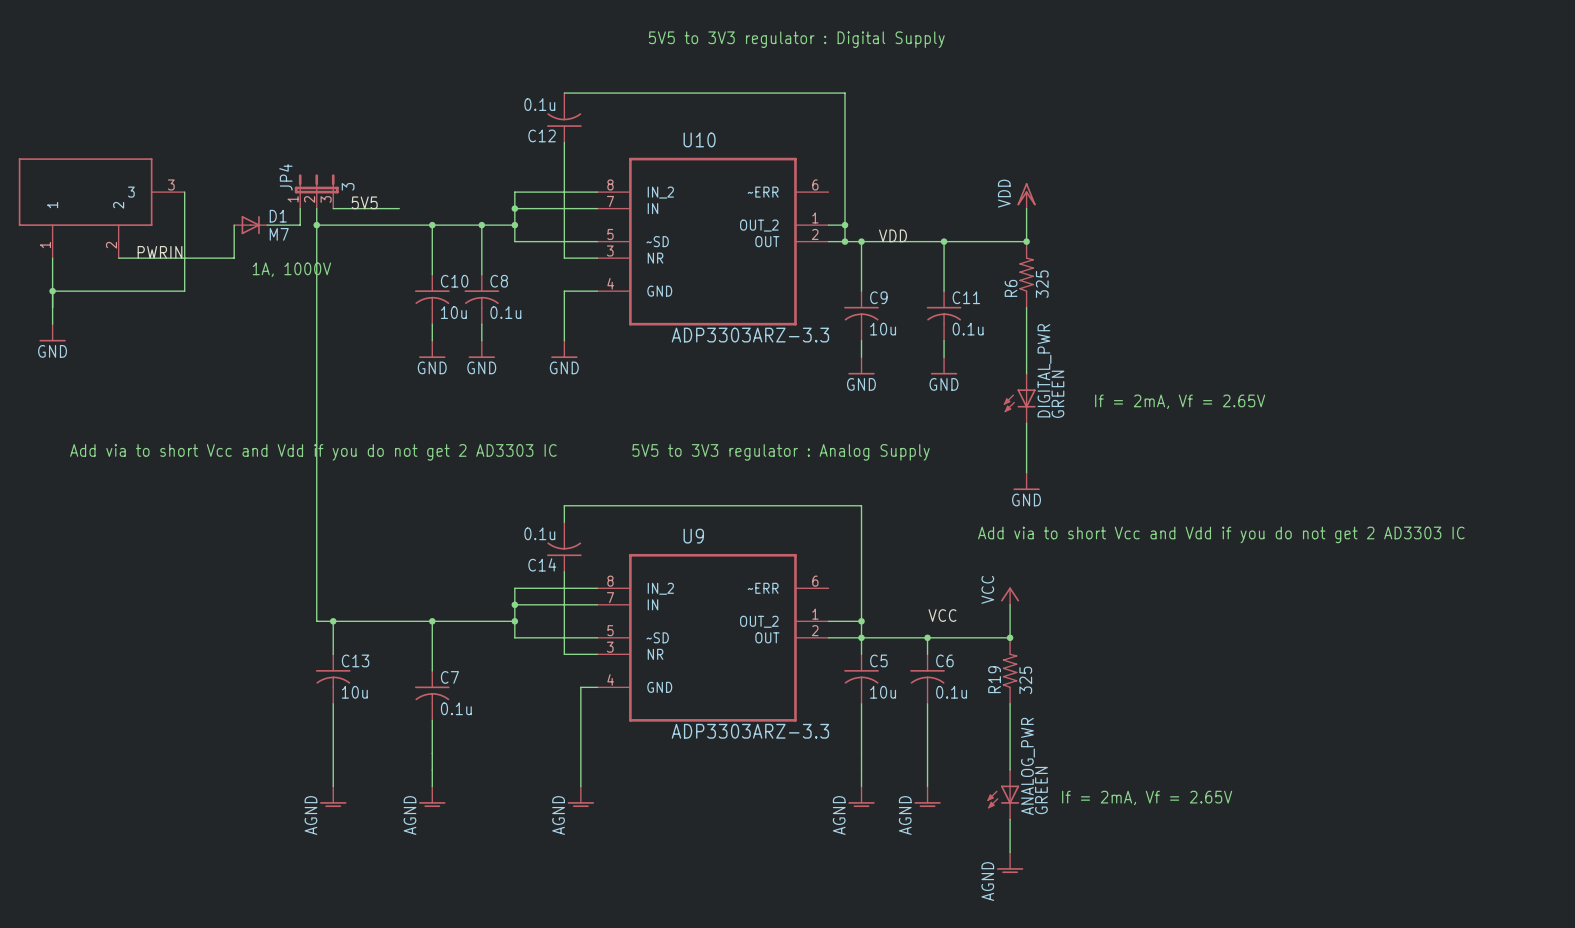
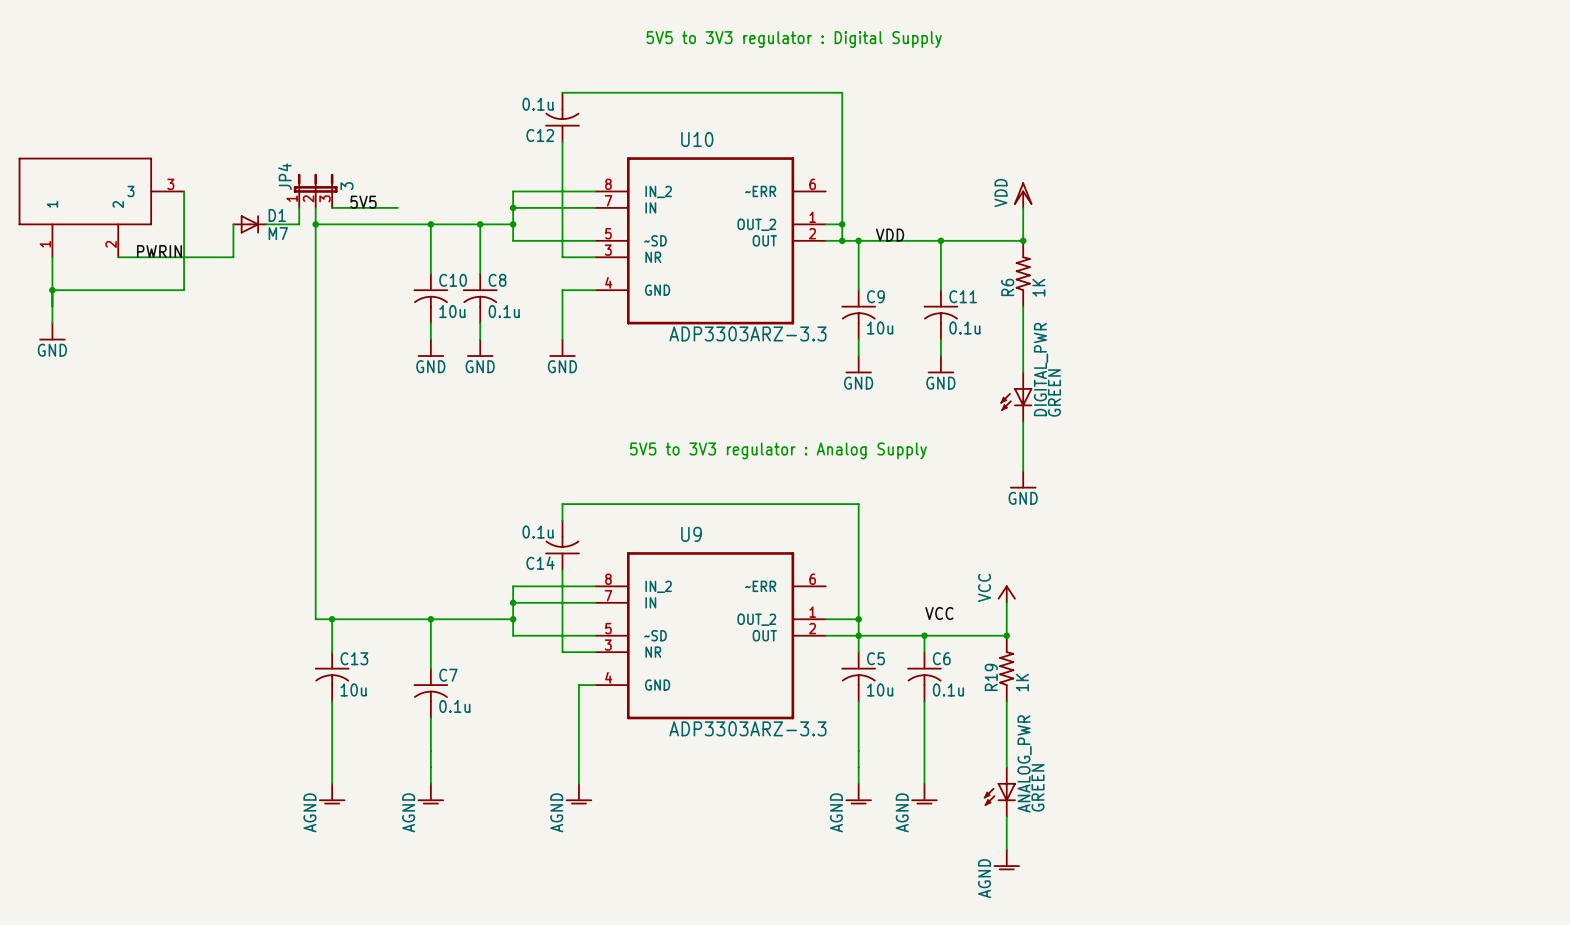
text: 1A, 1000V (291, 269) -> none
R6 value: 325 (1042, 284) -> 1K (1038, 287)
text: If = 2mA, Vf = 2.65V (1180, 401) -> none
text: Add via to short Vcc and Vdd if you do not get 2 AD3303 IC (313, 452) -> none
text: Add via to short Vcc and Vdd if you do not get 2 AD3303 IC (1221, 534) -> none
R19 value: 325 (1025, 680) -> 1K (1022, 682)
text: If = 2mA, Vf = 2.65V (1147, 797) -> none

